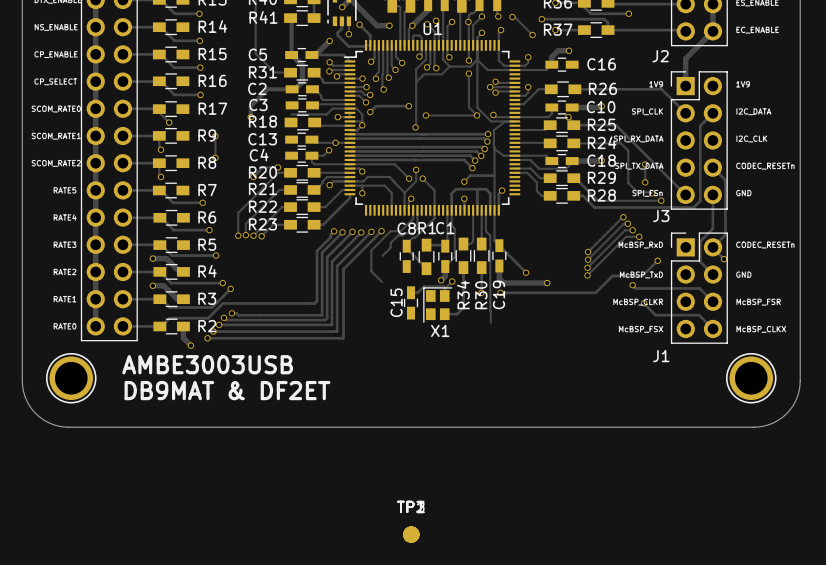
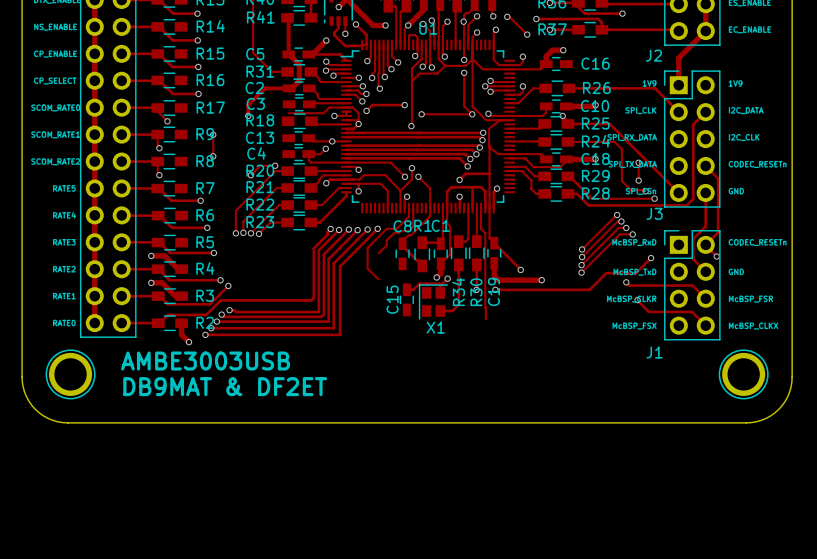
part: (411, 534) -> none
part: (411, 534) -> none
part: (411, 534) -> none

